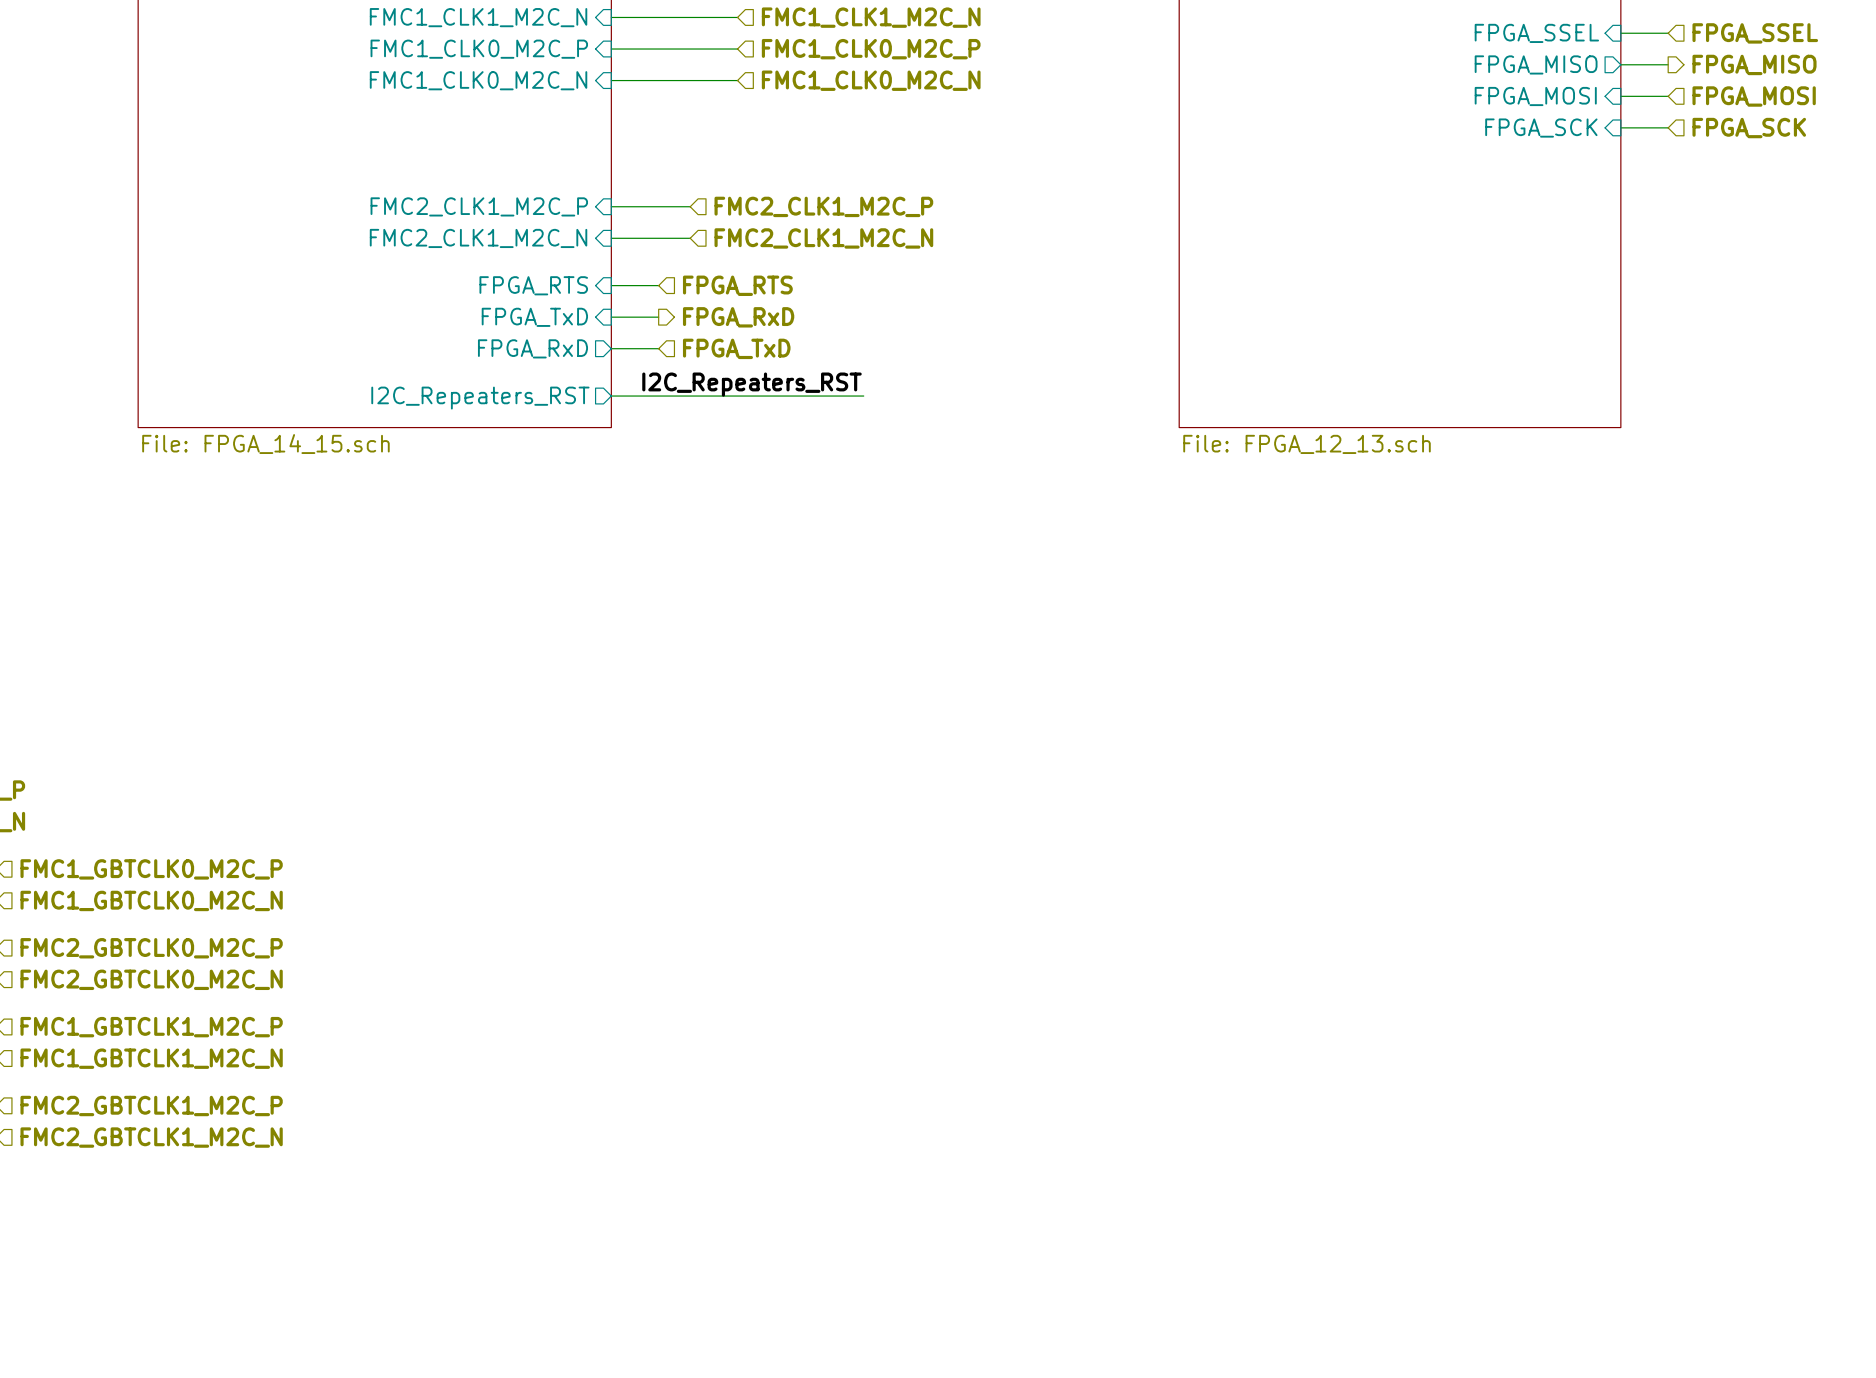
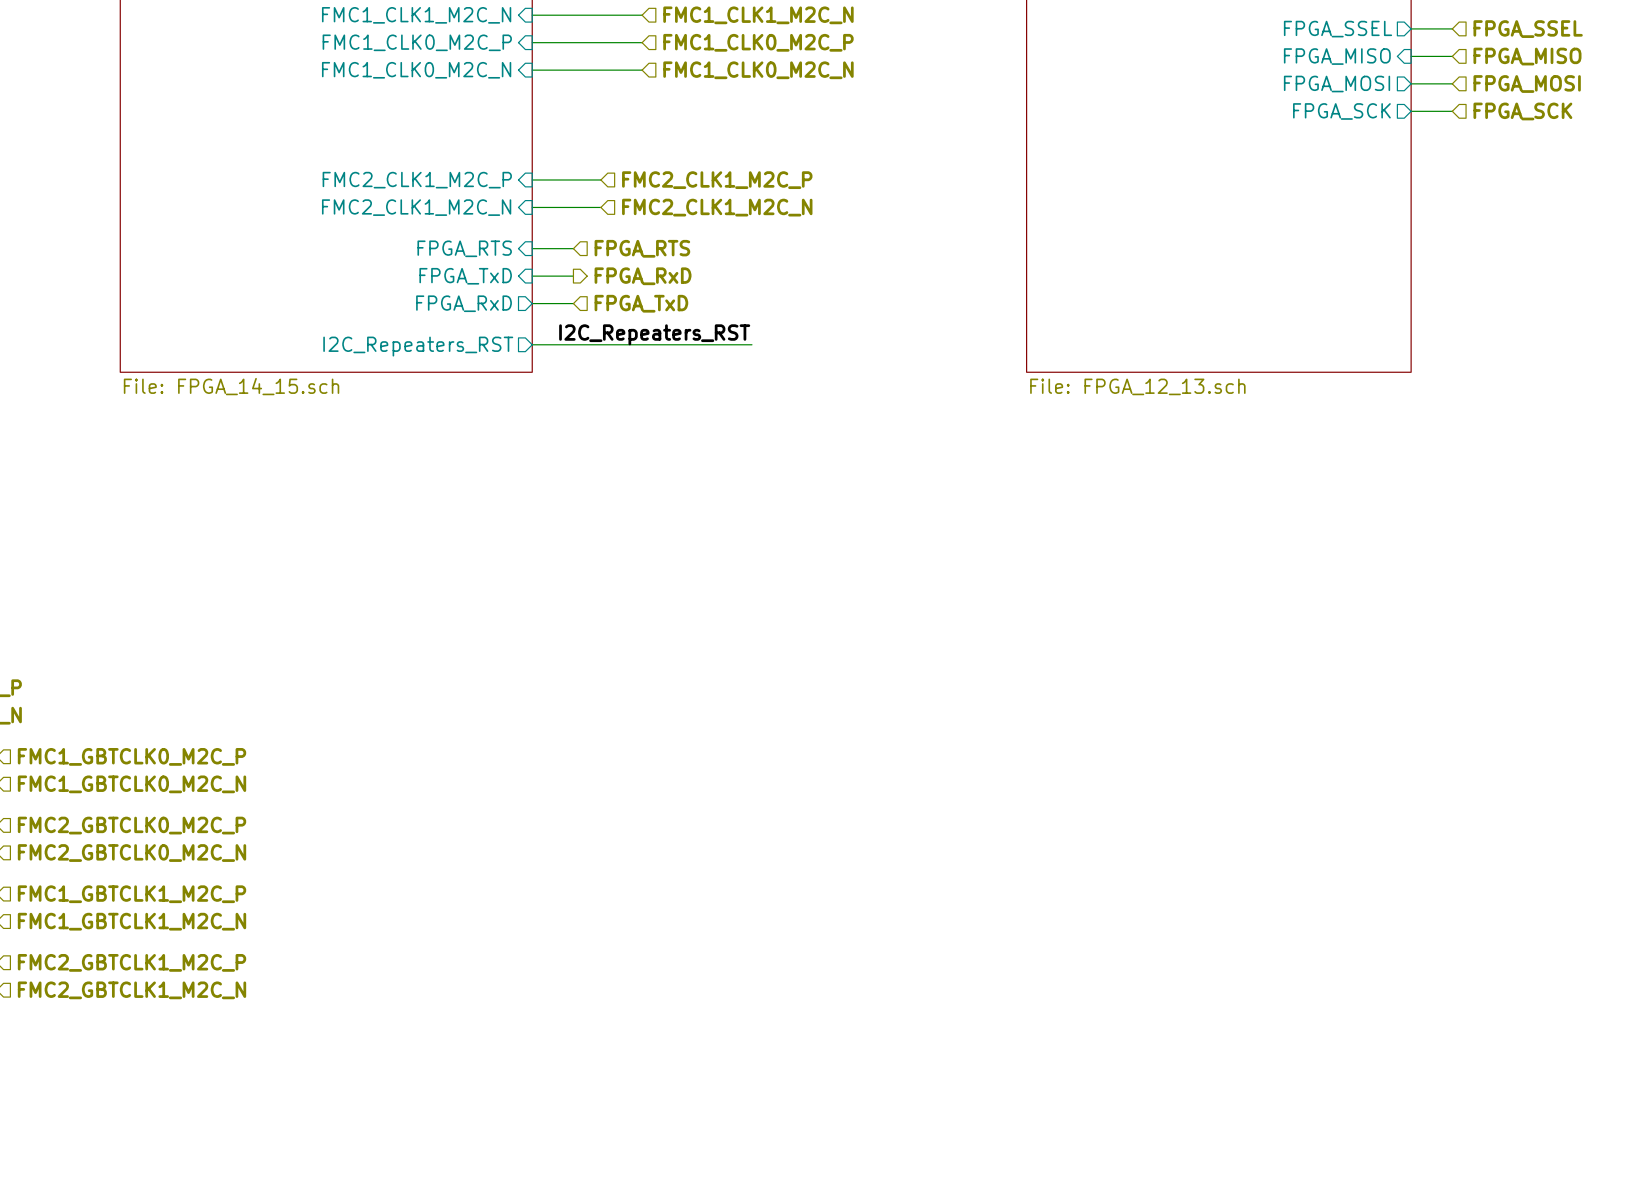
sheet pin shape: input (1536, 33) -> output (1337, 29)
sheet pin shape: output (1536, 64) -> input (1337, 56)
hierarchical label shape: output (1754, 64) -> input (1527, 56)
sheet pin shape: input (1535, 96) -> output (1337, 84)
sheet pin shape: input (1541, 128) -> output (1341, 111)

